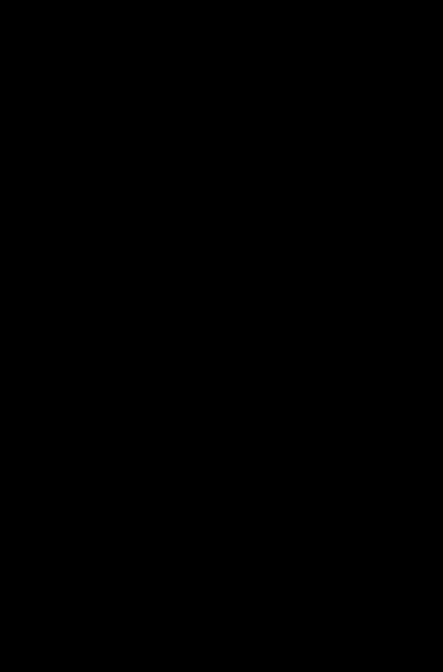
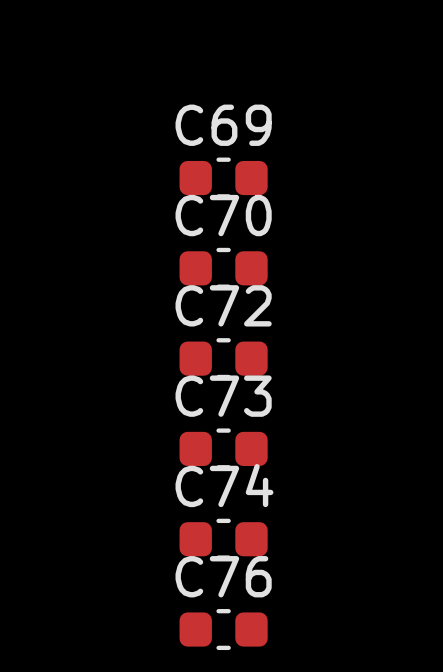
C69: none -> (223, 178)
C70: none -> (223, 268)
C72: none -> (223, 358)
C73: none -> (223, 448)
C74: none -> (223, 539)
C76: none -> (223, 629)

